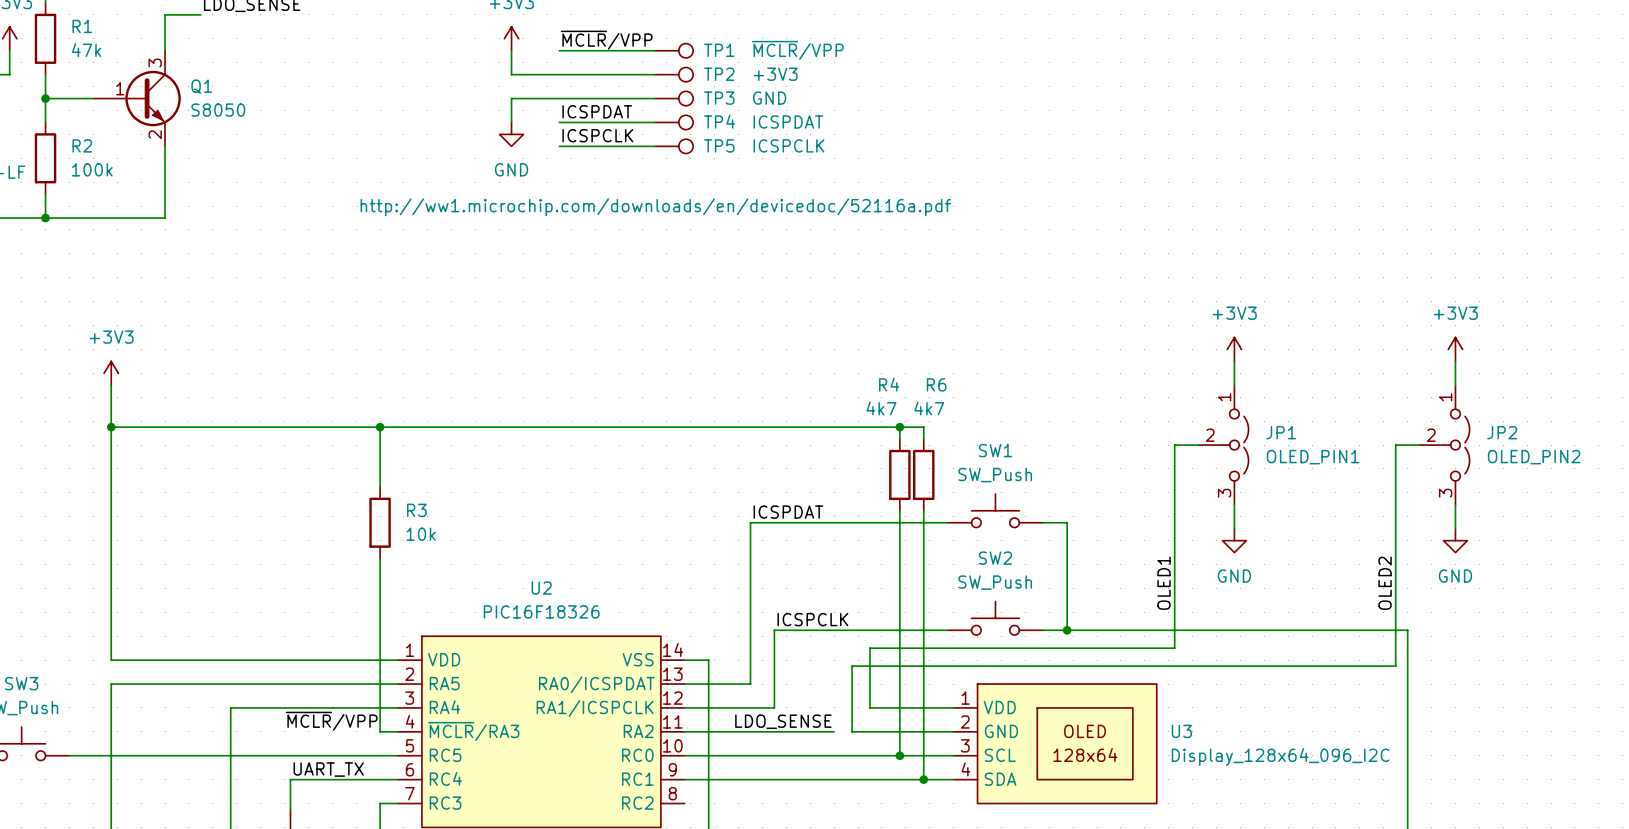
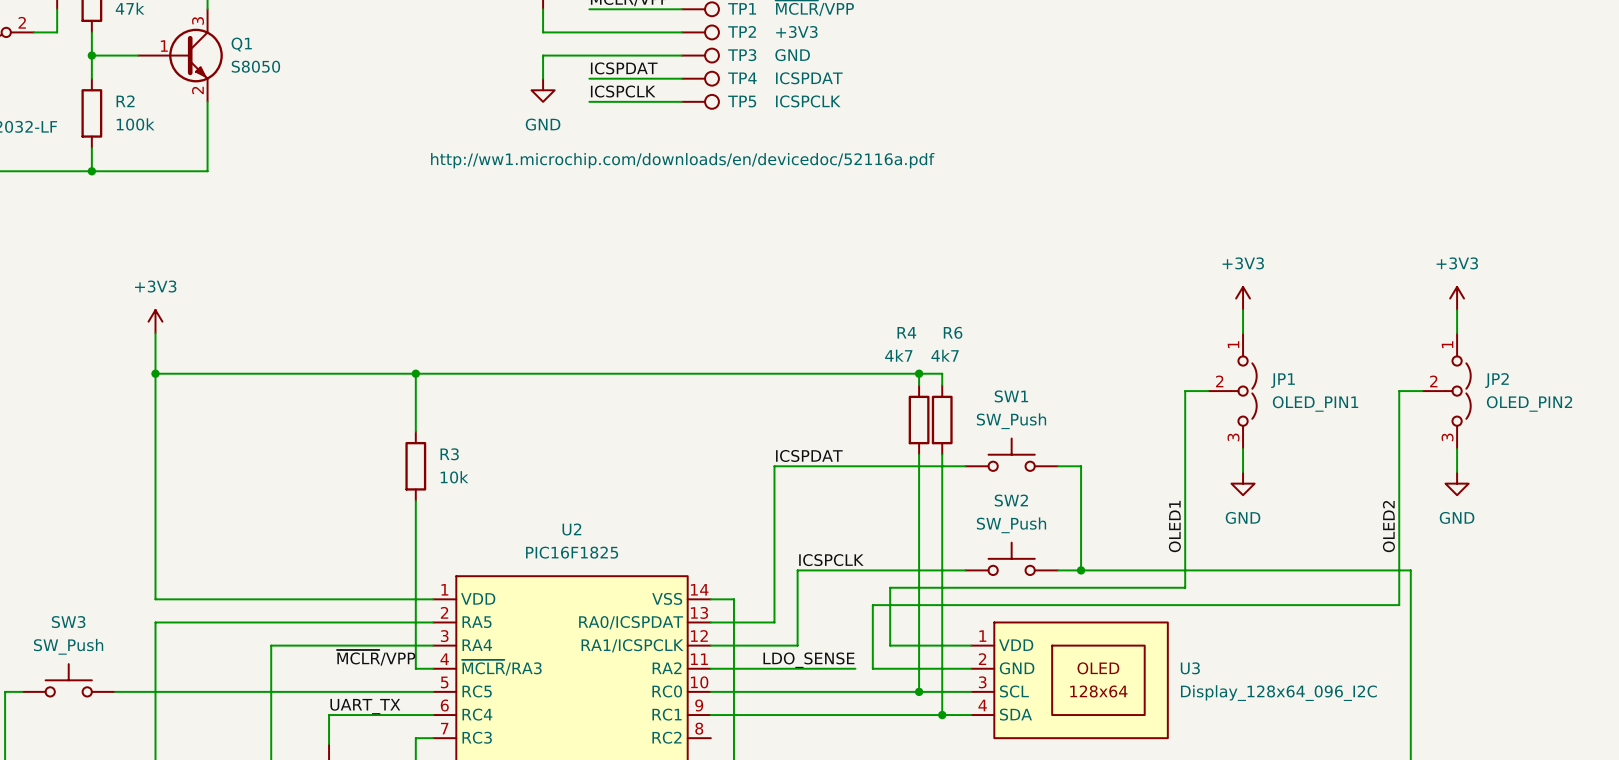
U2 value: PIC16F18326 (541, 611) -> PIC16F1825 (572, 552)

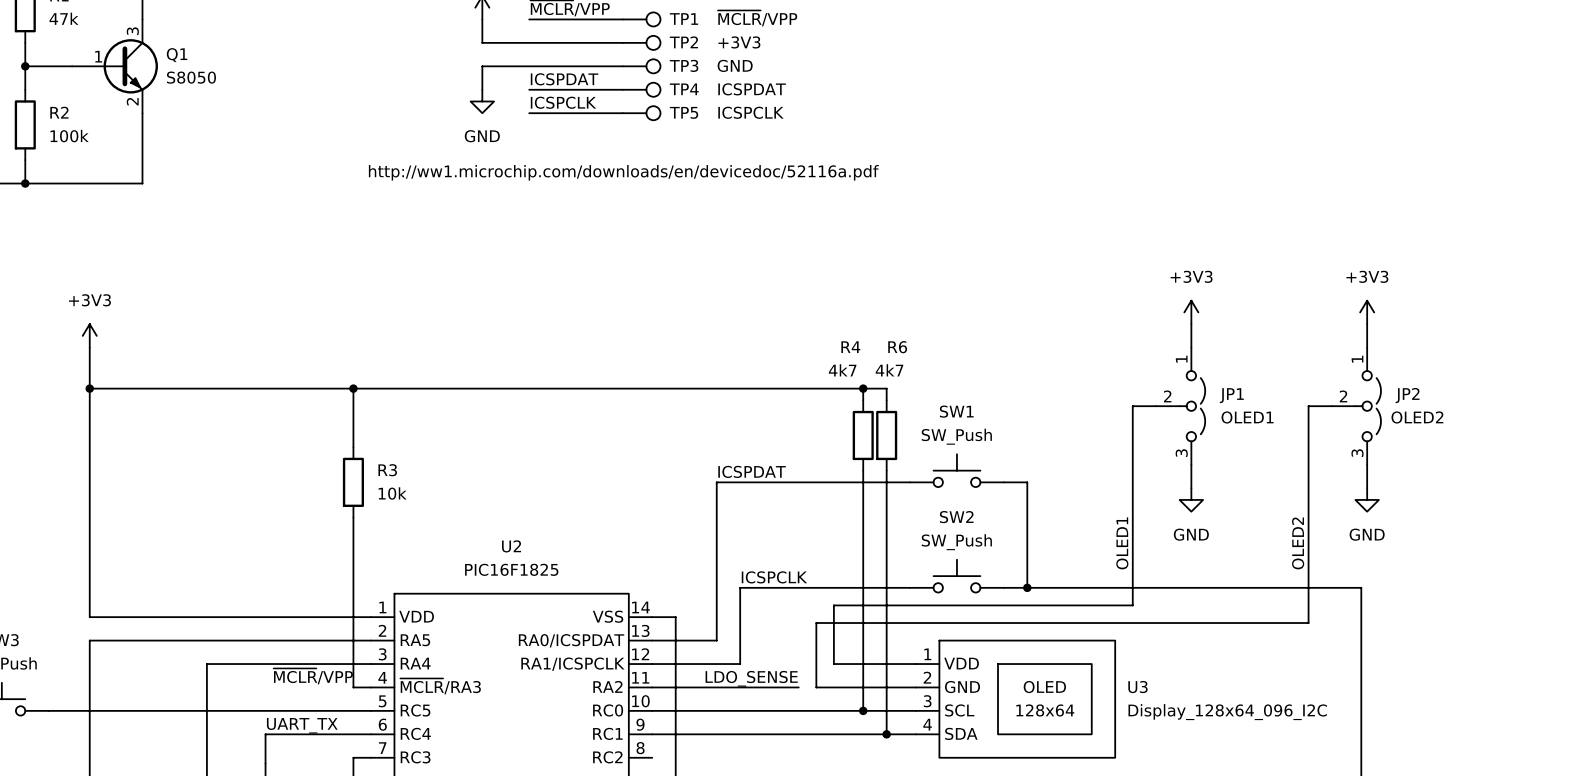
power symbol position: +3V3 (1457, 298) -> +3V3 (1367, 312)
wire: (1457, 310) (1457, 333) -> (1367, 324) (1367, 347)
wire: (1422, 391) (1399, 391) (1399, 605) (1358, 605) -> (1332, 406) (1308, 406) (1308, 623)
JP2 position: (1446, 391) -> (1356, 406)
JP1 value: OLED_PIN1 (1315, 403) -> OLED1 (1247, 417)
JP2 value: OLED_PIN2 (1529, 403) -> OLED2 (1417, 417)
wire: (1457, 448) (1457, 472) -> (1367, 464) (1367, 488)
power symbol position: GND (1457, 483) -> GND (1367, 499)
label position: OLED2 (1388, 526) -> OLED2 (1298, 543)

